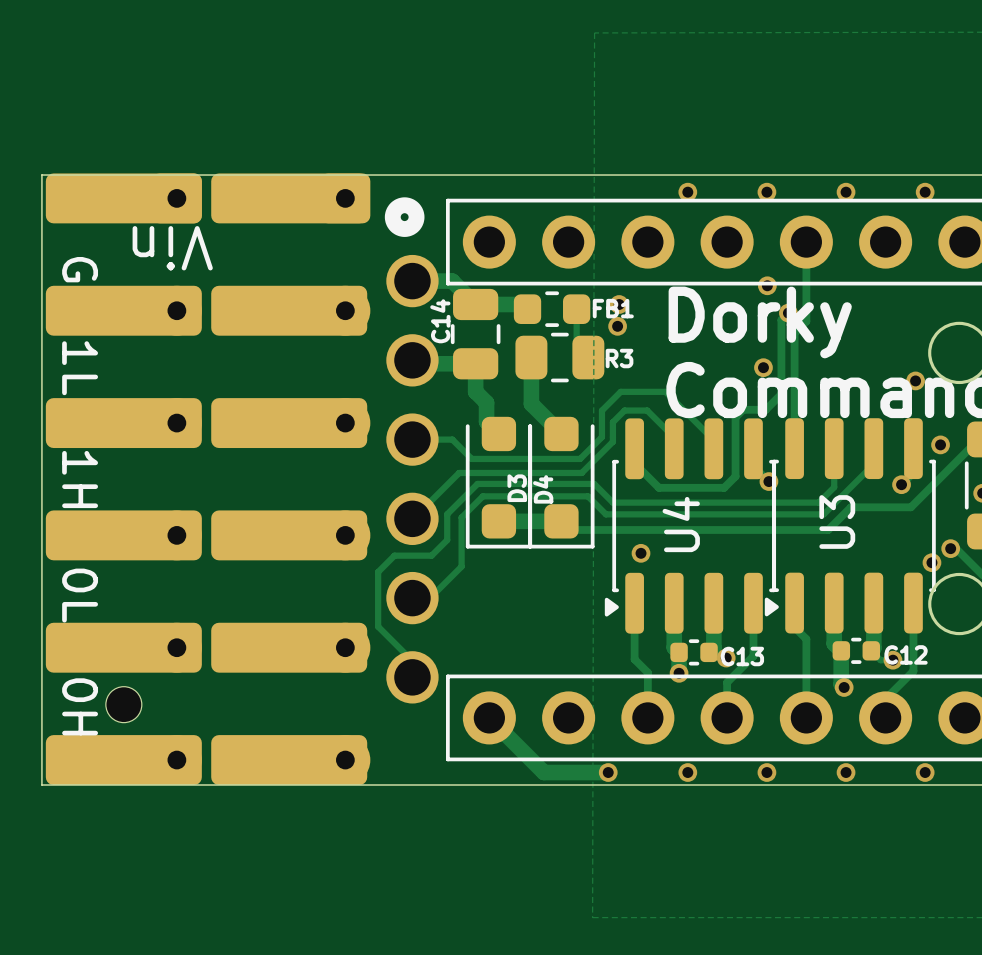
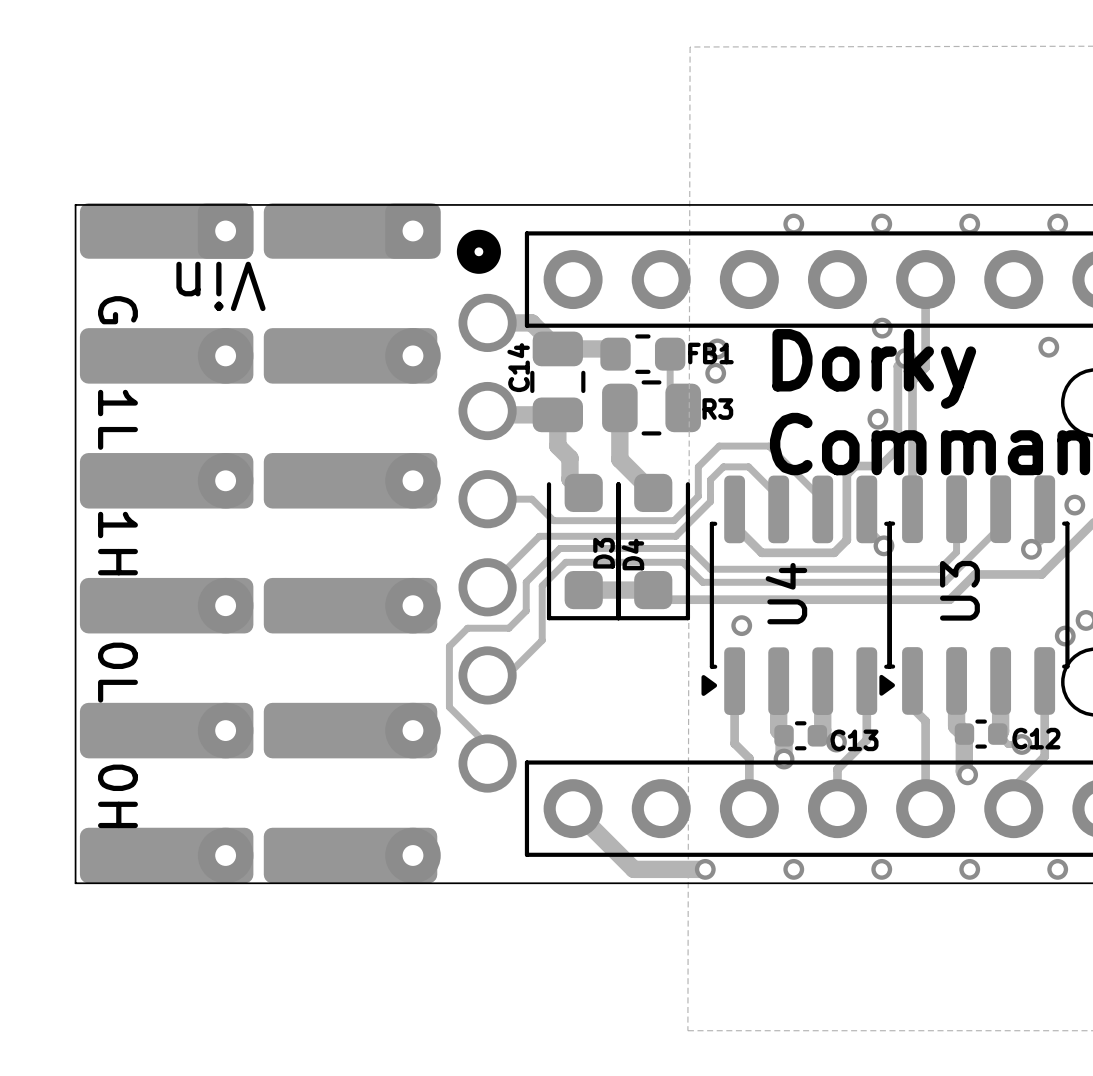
via position: (915, 380) -> (1048, 347)
part: (123, 704) -> none

